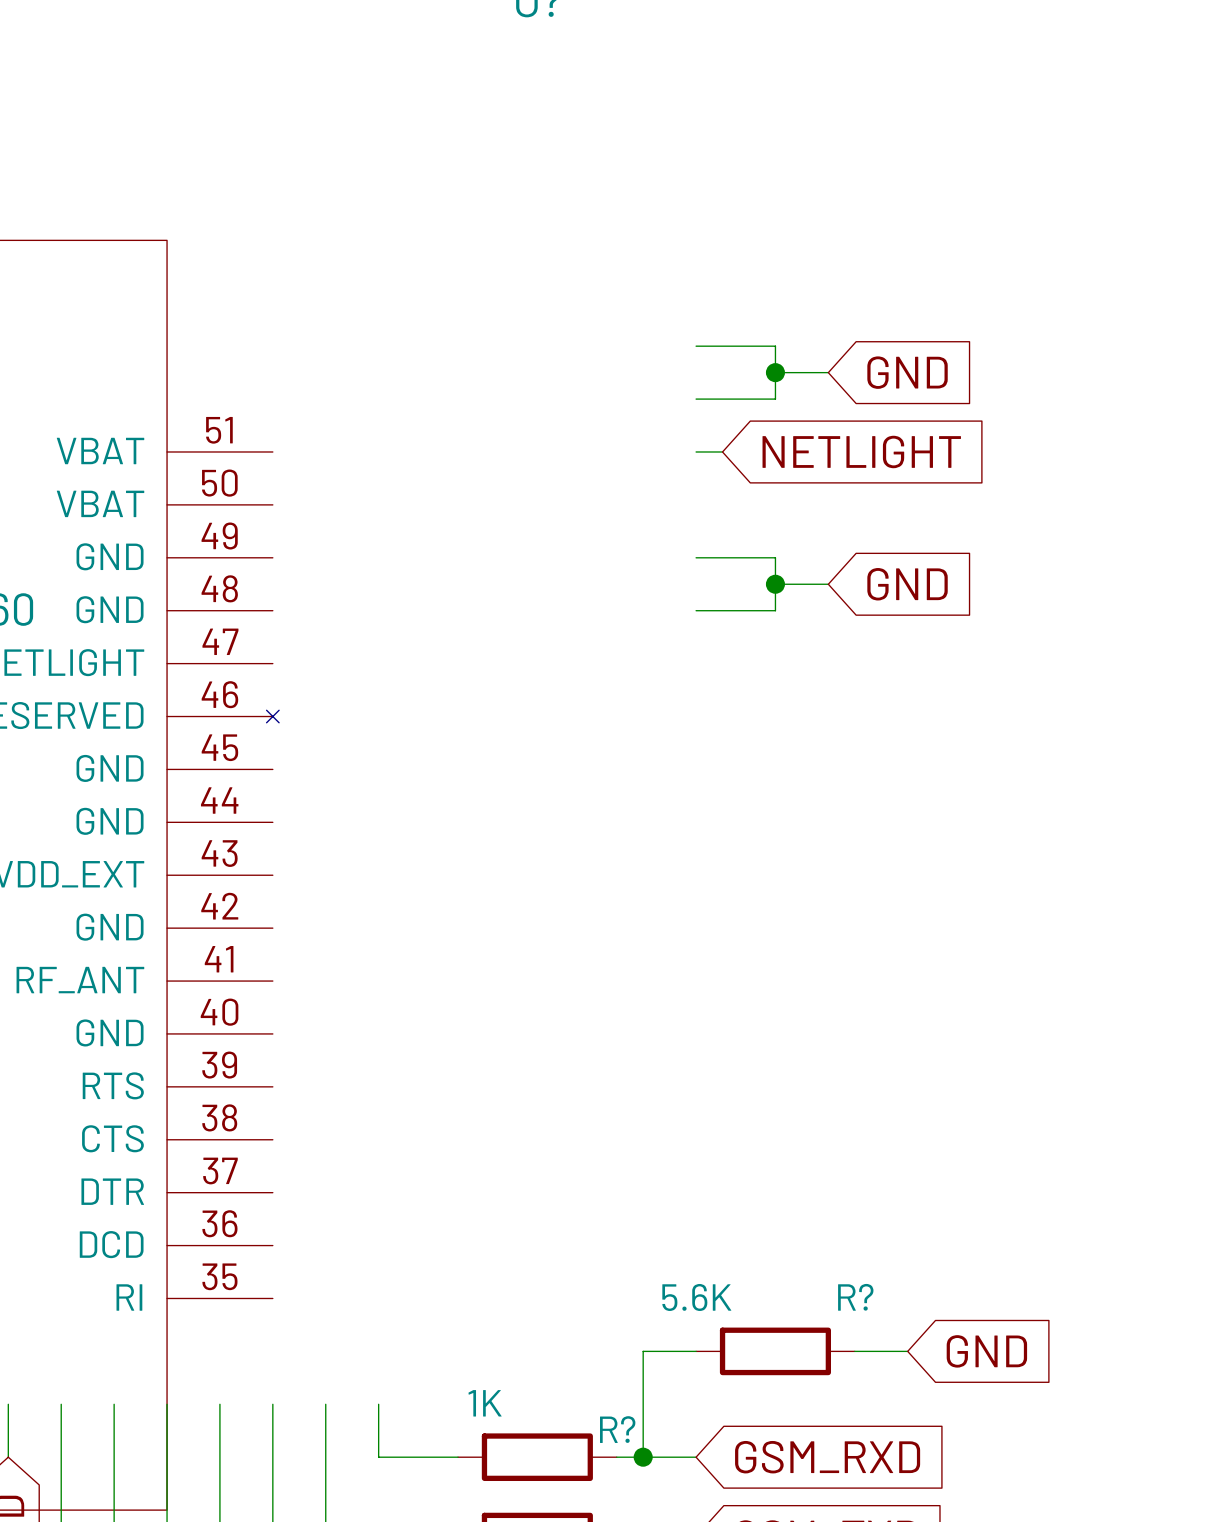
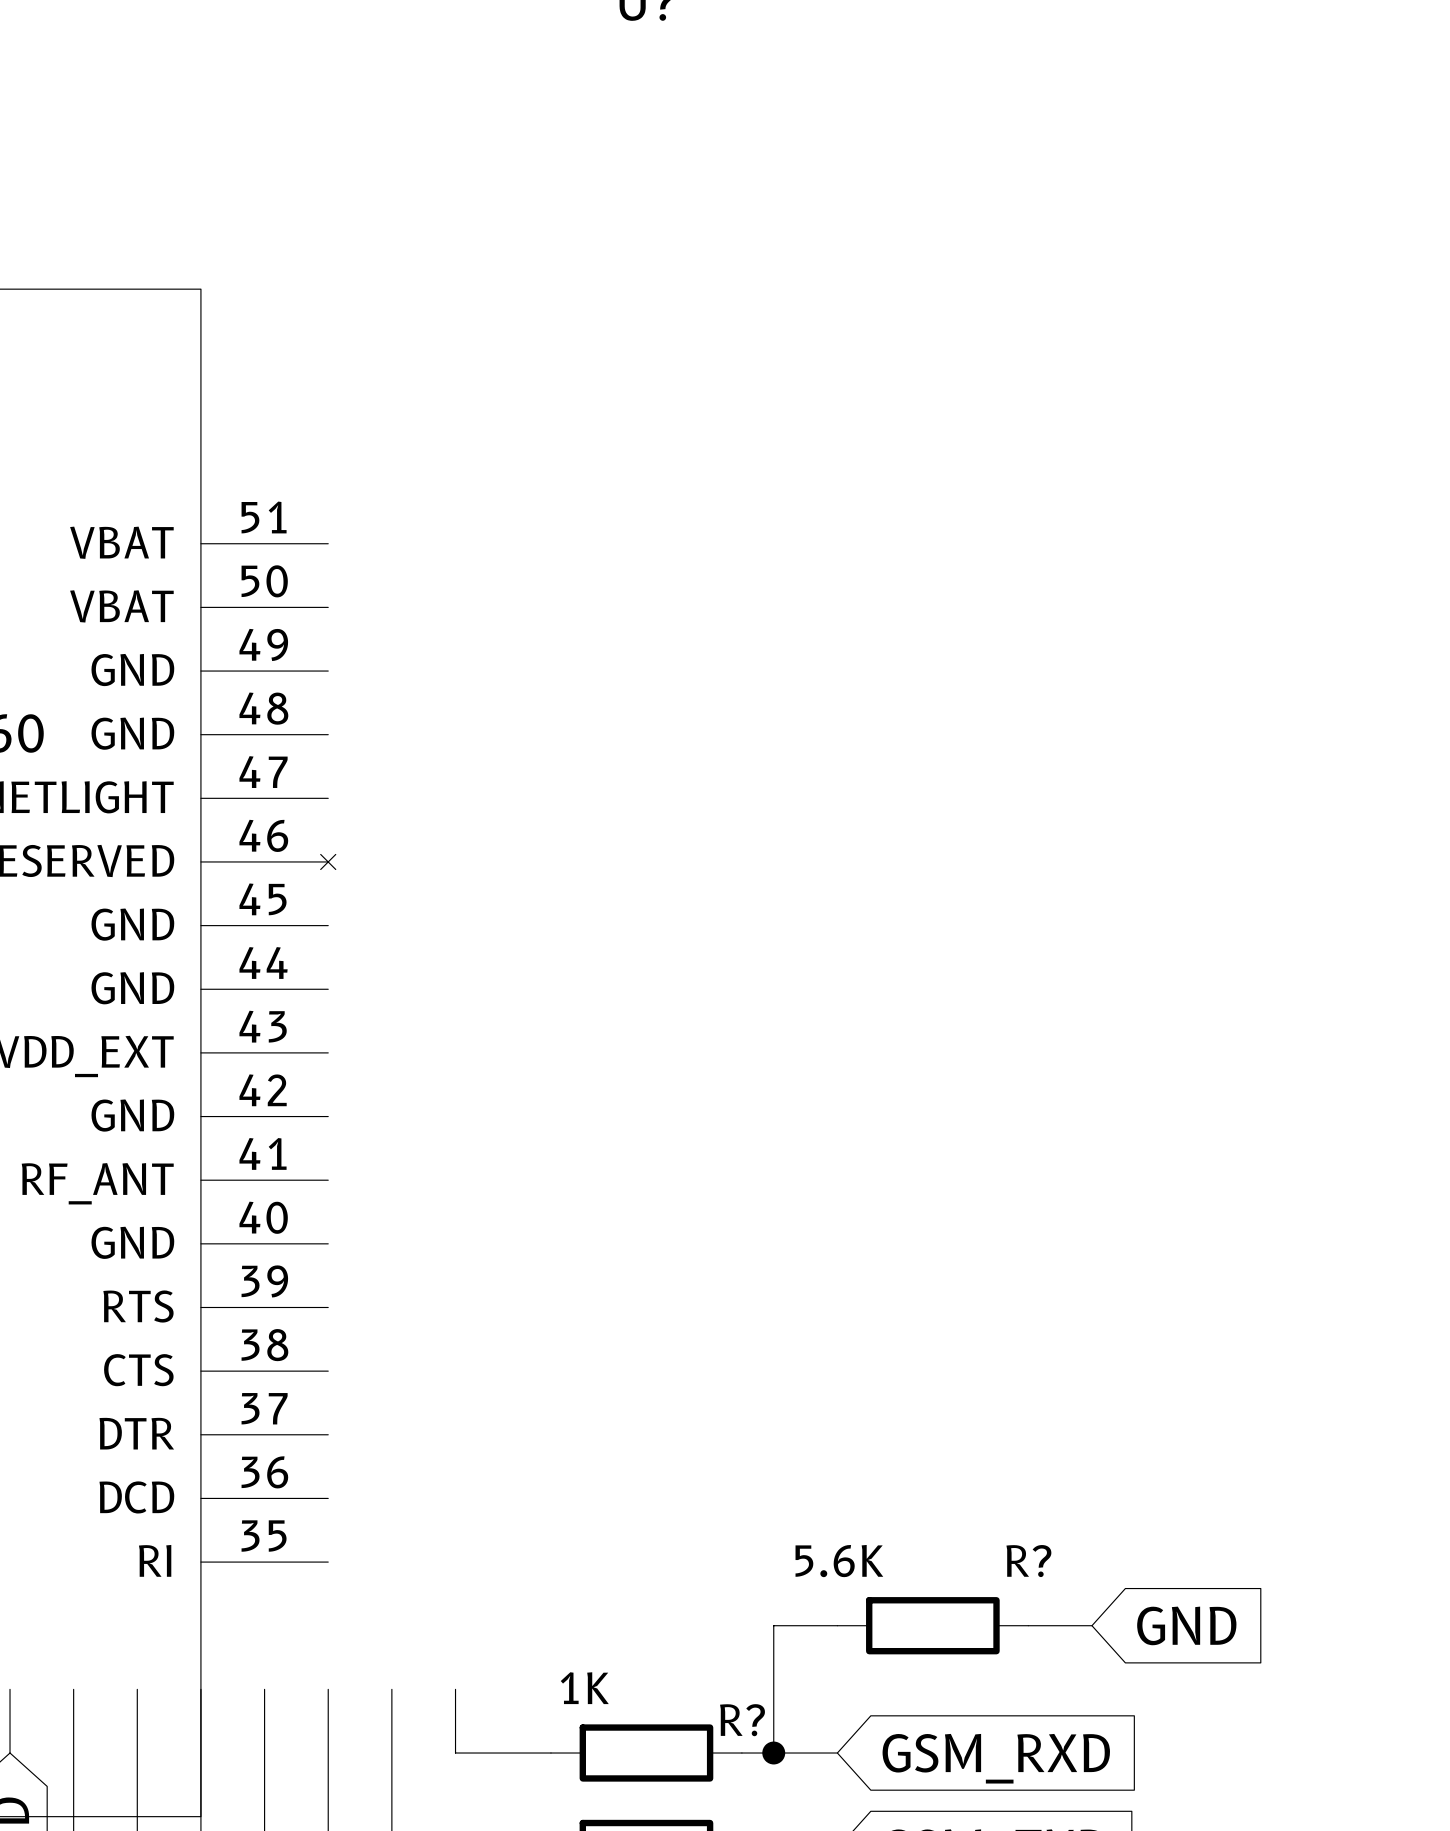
wire: (696, 346) (775, 346) (775, 399) (696, 399) -> none
wire: (775, 372) (828, 372) -> none
junction: (775, 372) -> none
global label: GND (907, 372) -> none
wire: (696, 451) (722, 451) -> none
global label: NETLIGHT (861, 451) -> none
wire: (696, 557) (775, 557) (775, 610) (696, 610) -> none
wire: (775, 584) (828, 584) -> none
junction: (775, 584) -> none
global label: GND (907, 584) -> none

